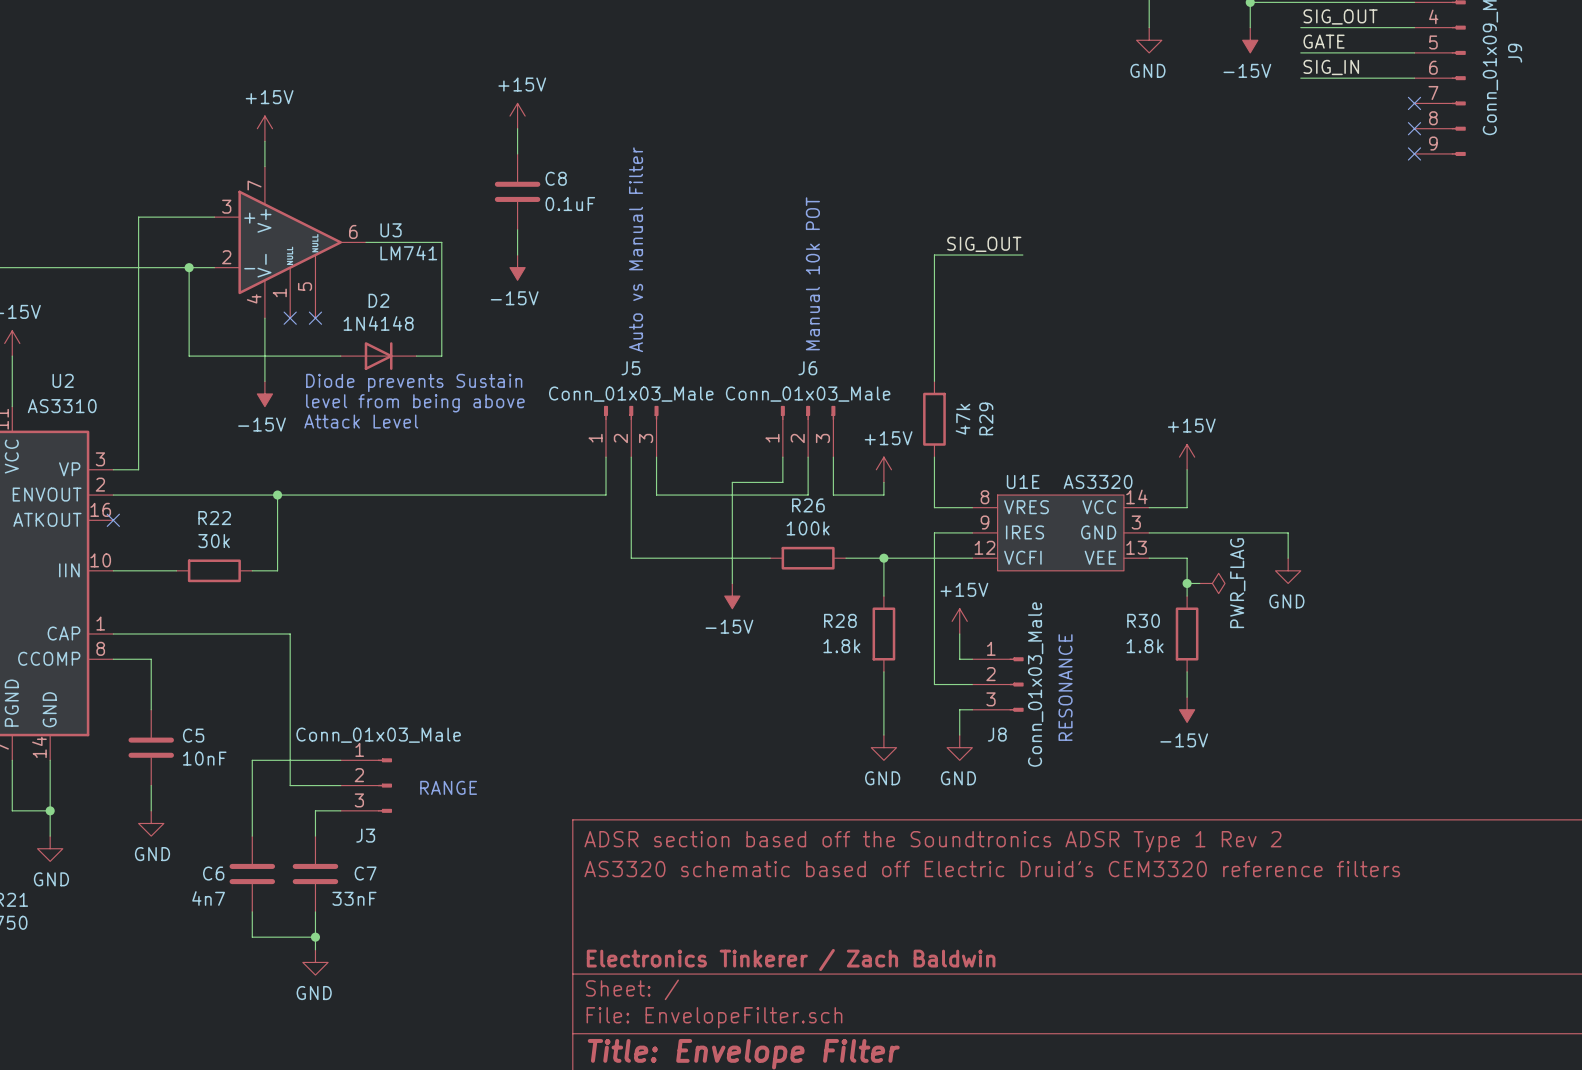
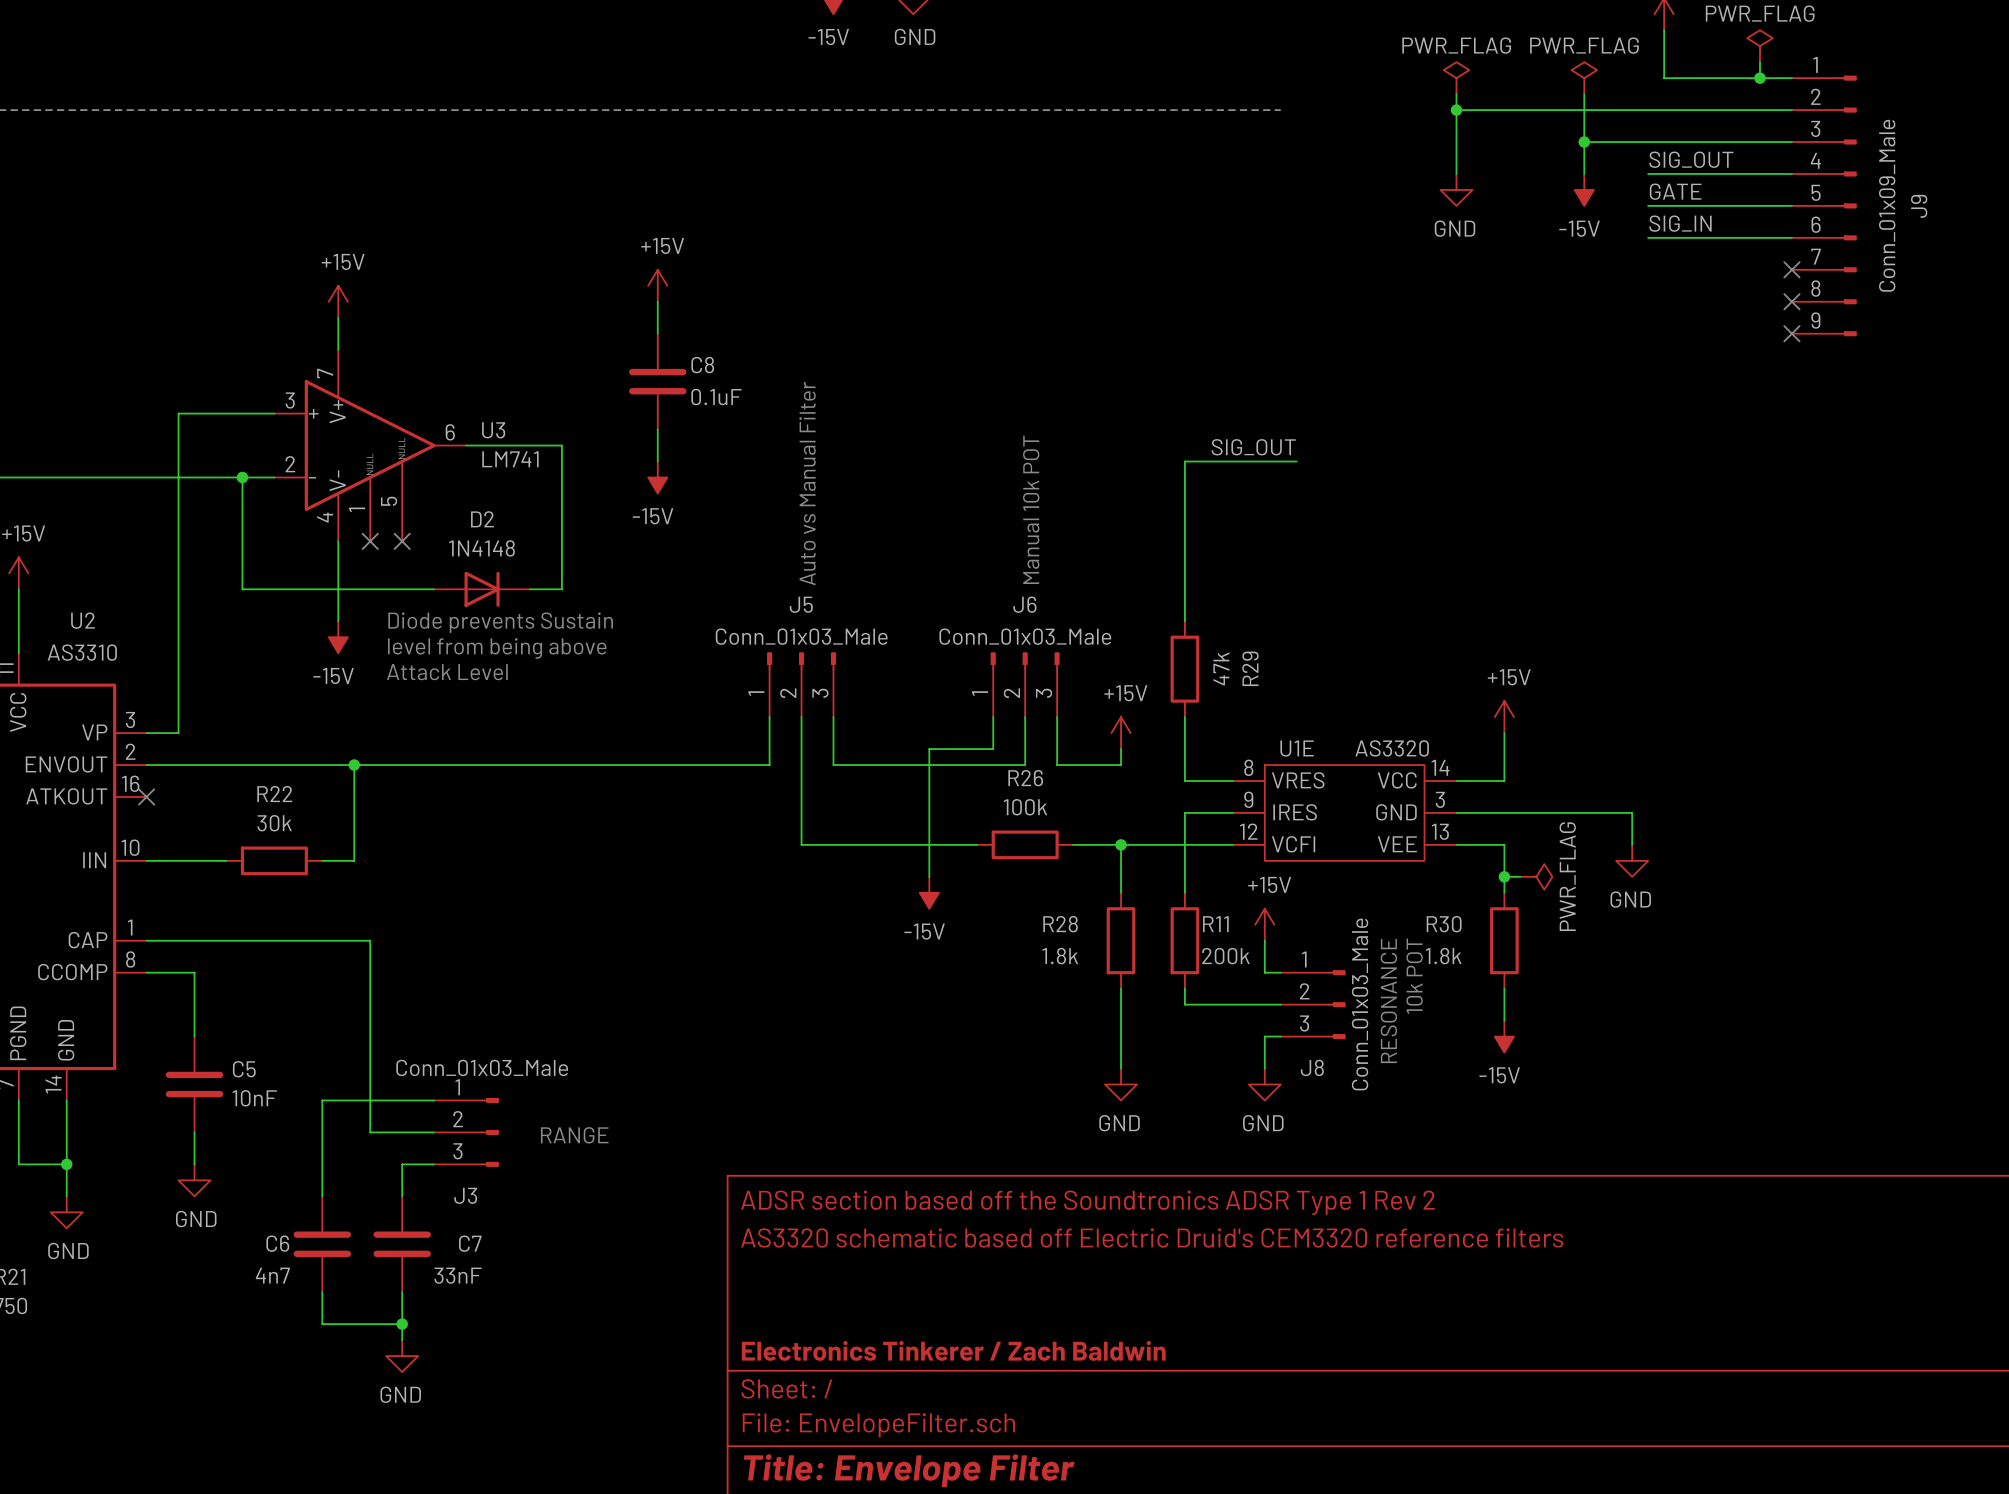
wire: (934, 596) (934, 671) -> none
power symbol position: +15V (959, 621) -> +15V (1264, 924)
R11: none -> 200k (1184, 940)
wire: (959, 633) (959, 659) (972, 659) -> (1264, 940) (1264, 972) (1280, 972)
text: none -> 10k POT (1414, 976)
J8 position: (997, 684) -> (1313, 1004)
text position: RESONANCE (1065, 687) -> RESONANCE (1388, 1001)
wire: (972, 709) (959, 709) (959, 735) -> (1280, 1036) (1264, 1036) (1264, 1068)
power symbol position: GND (959, 747) -> GND (1264, 1084)

